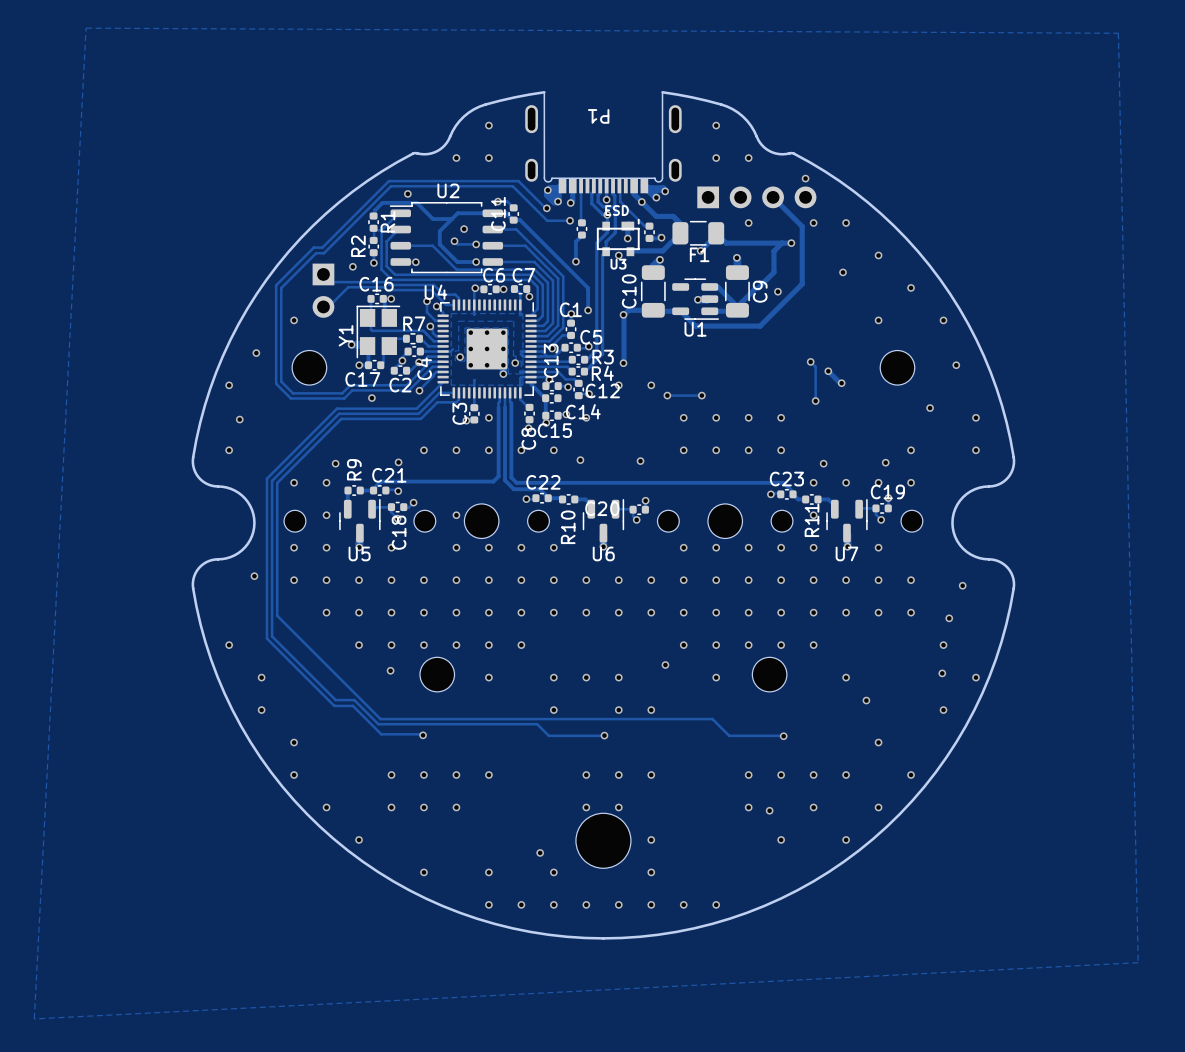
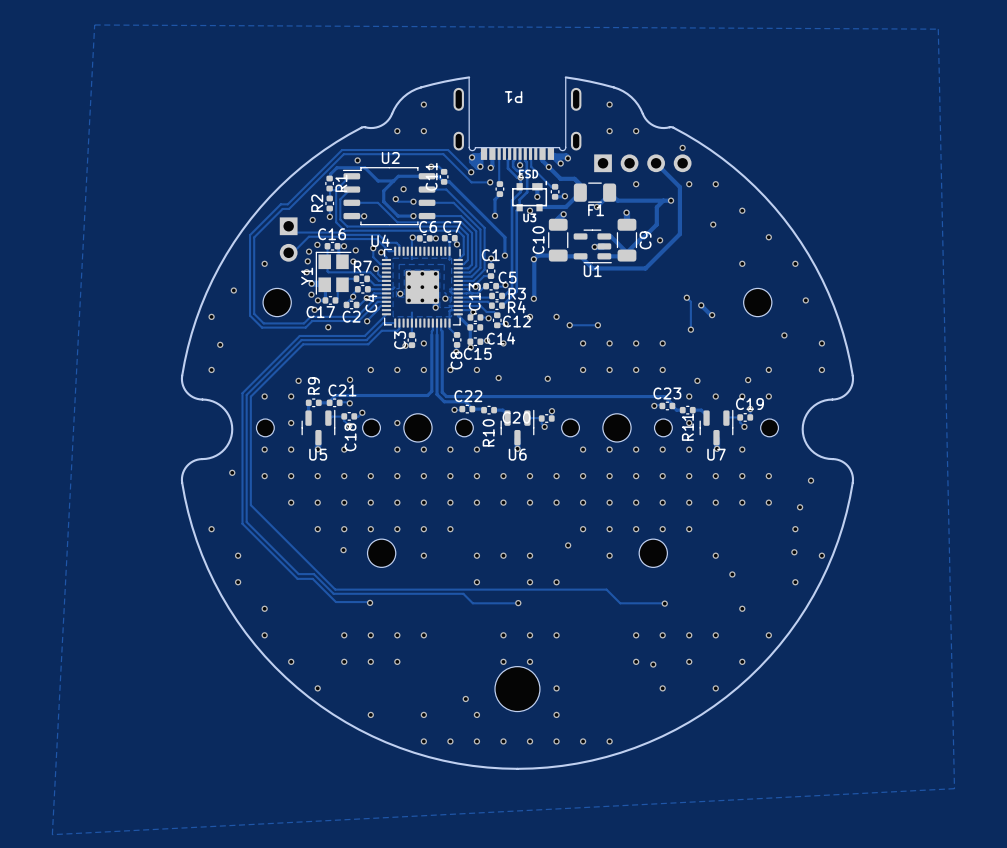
via: none -> (317, 244)
via: none -> (355, 250)
via: none -> (309, 251)
via: none -> (307, 261)
via: none -> (353, 261)
via: none -> (306, 272)
via: none -> (311, 294)
via: none -> (314, 309)

